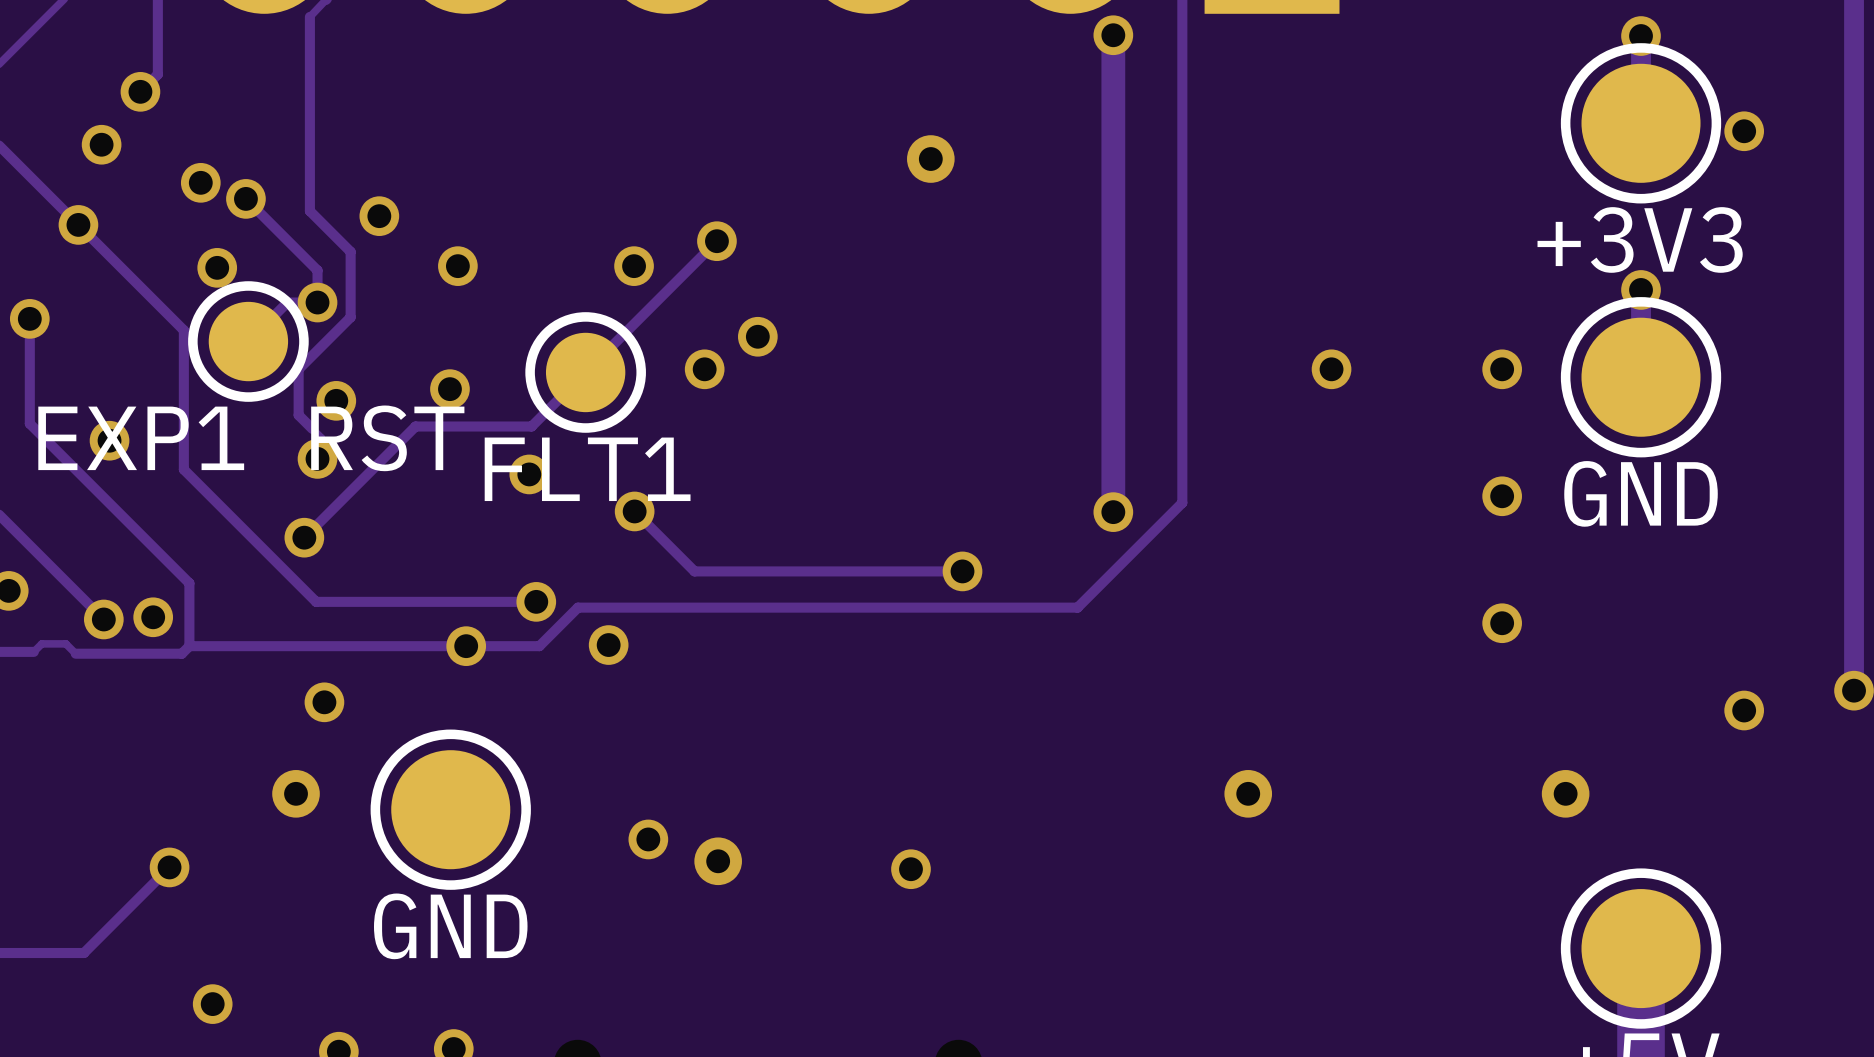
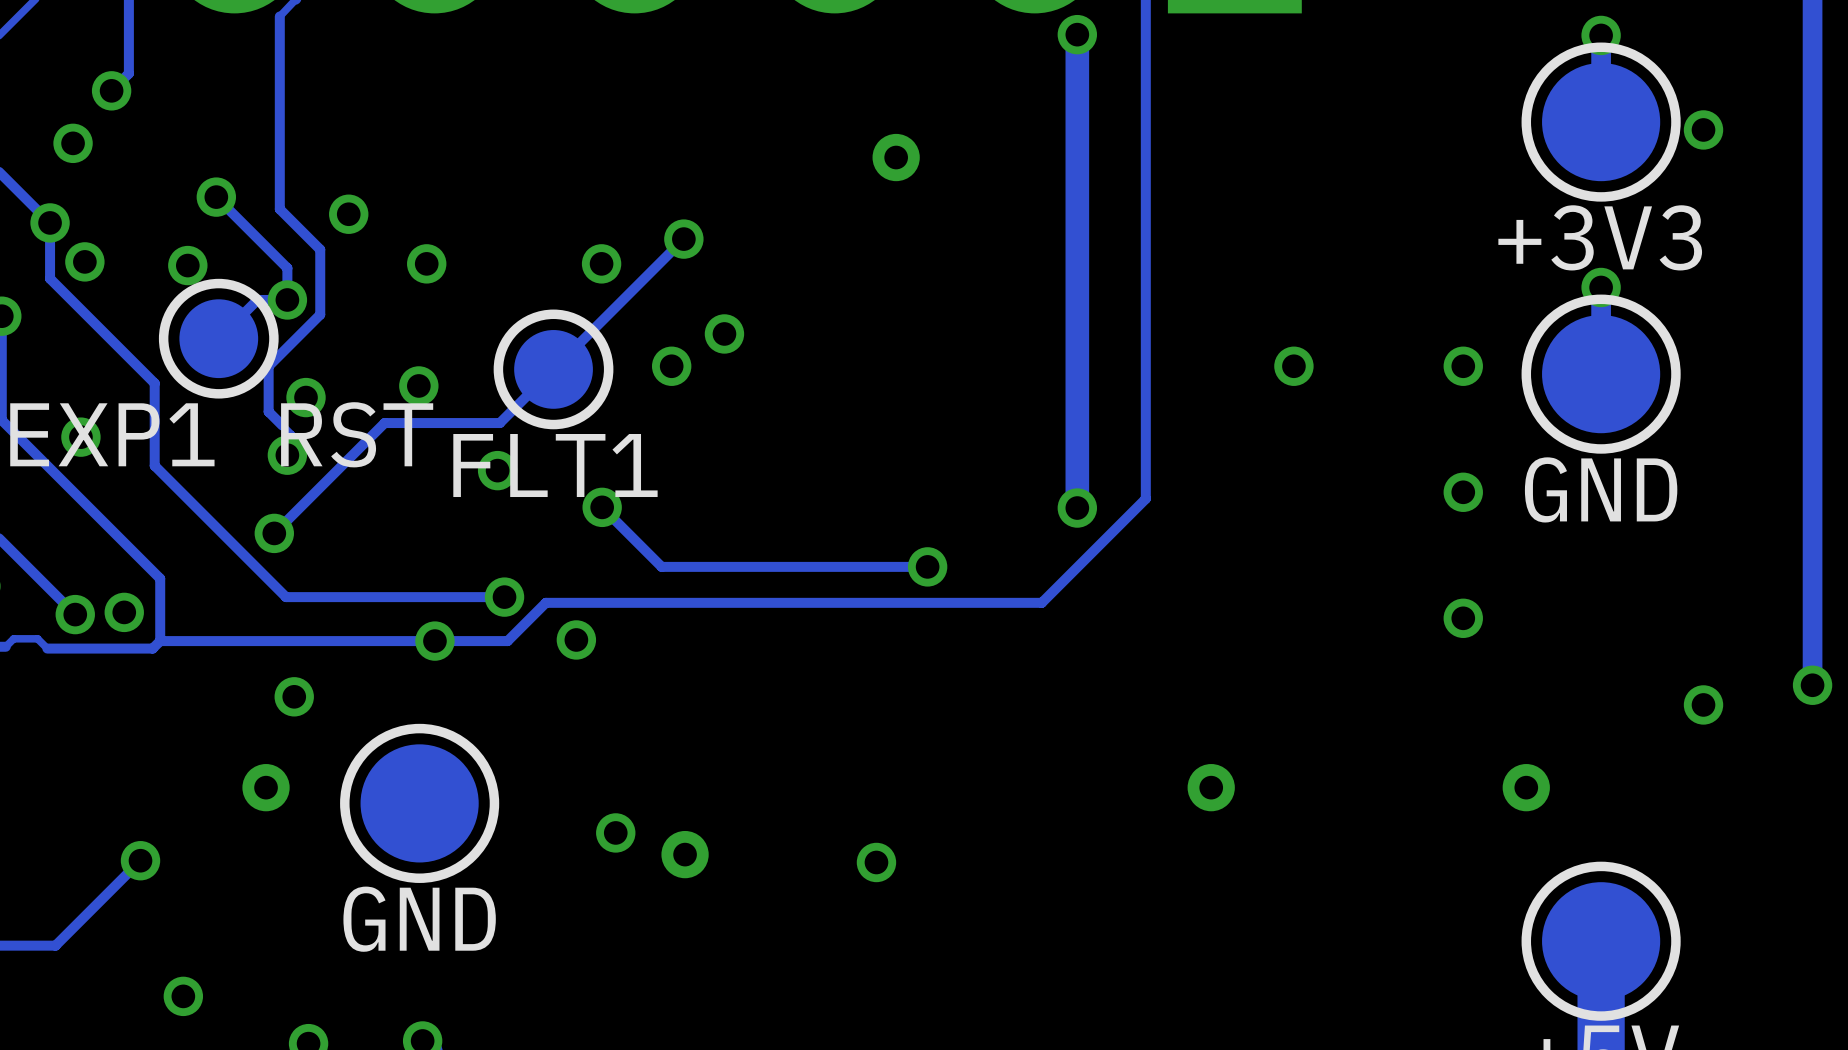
via position: (200, 182) -> (84, 261)
track: (78, 224) (183, 330) (183, 386) -> (50, 222) (50, 278) (154, 383)

